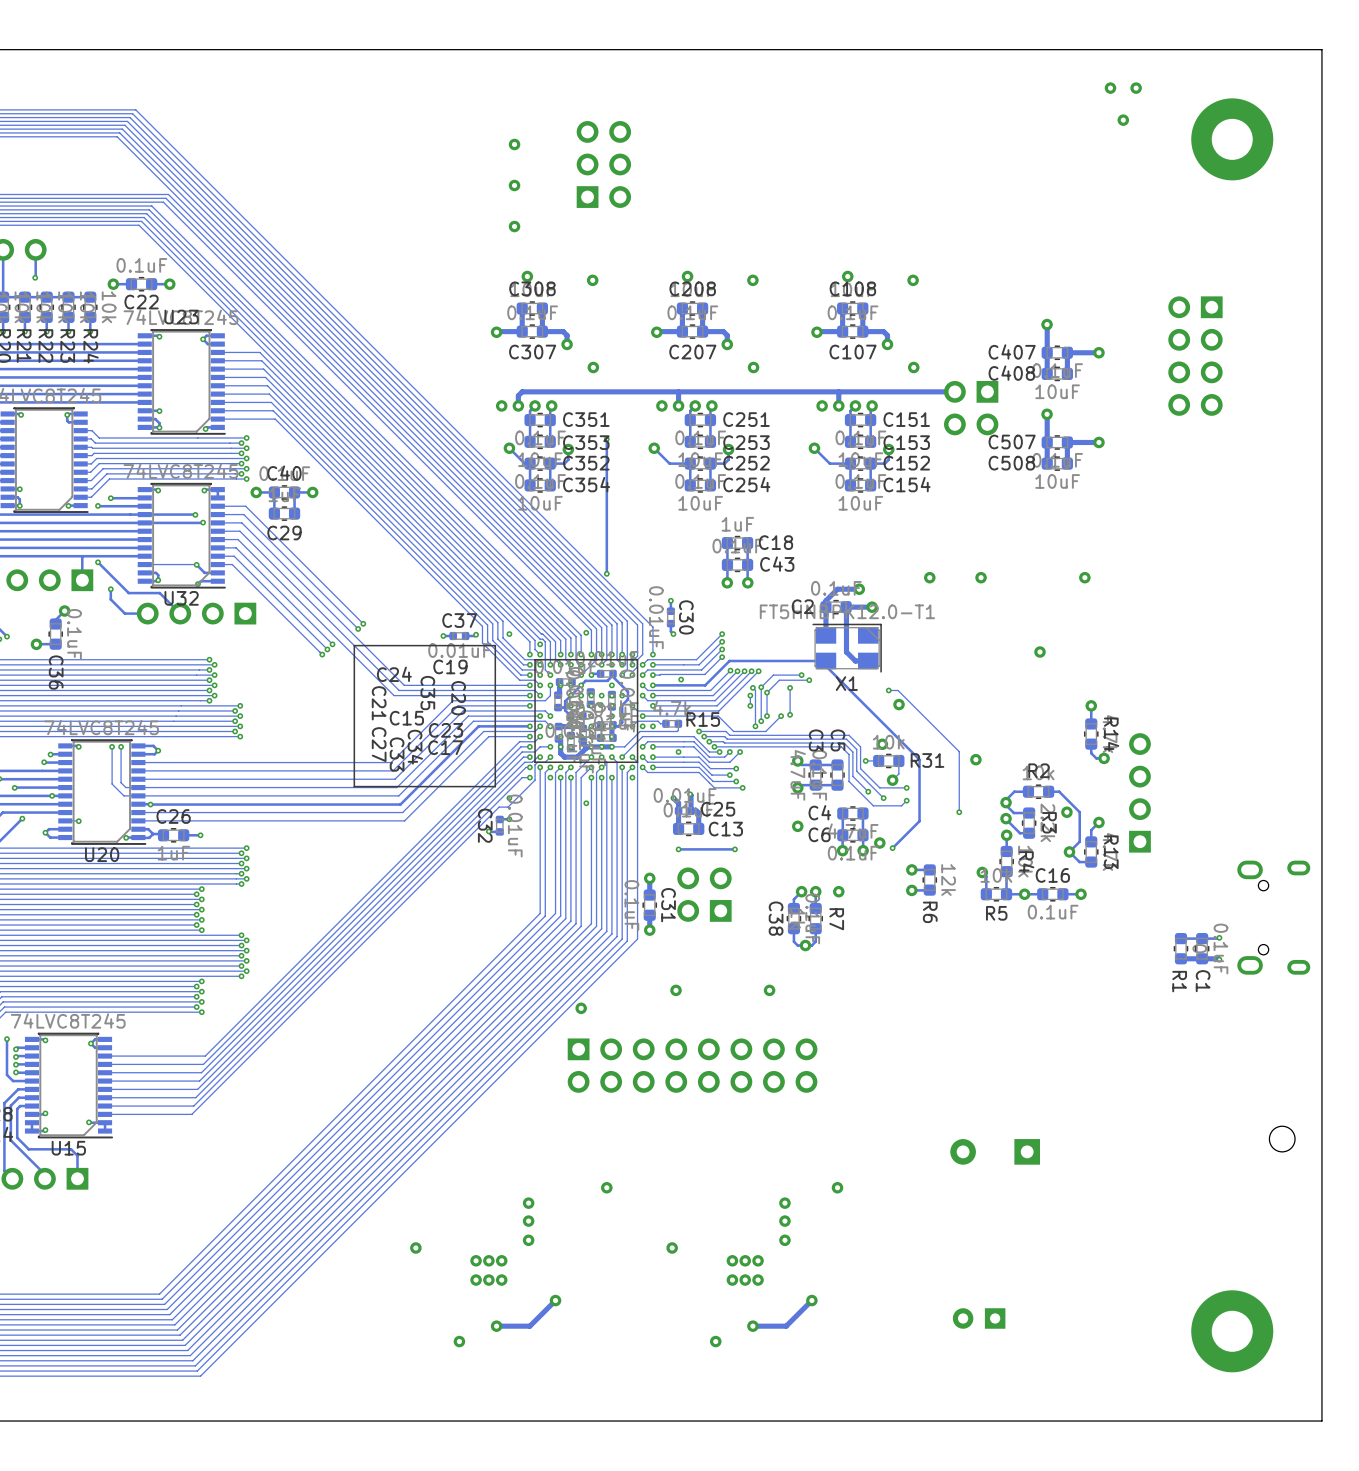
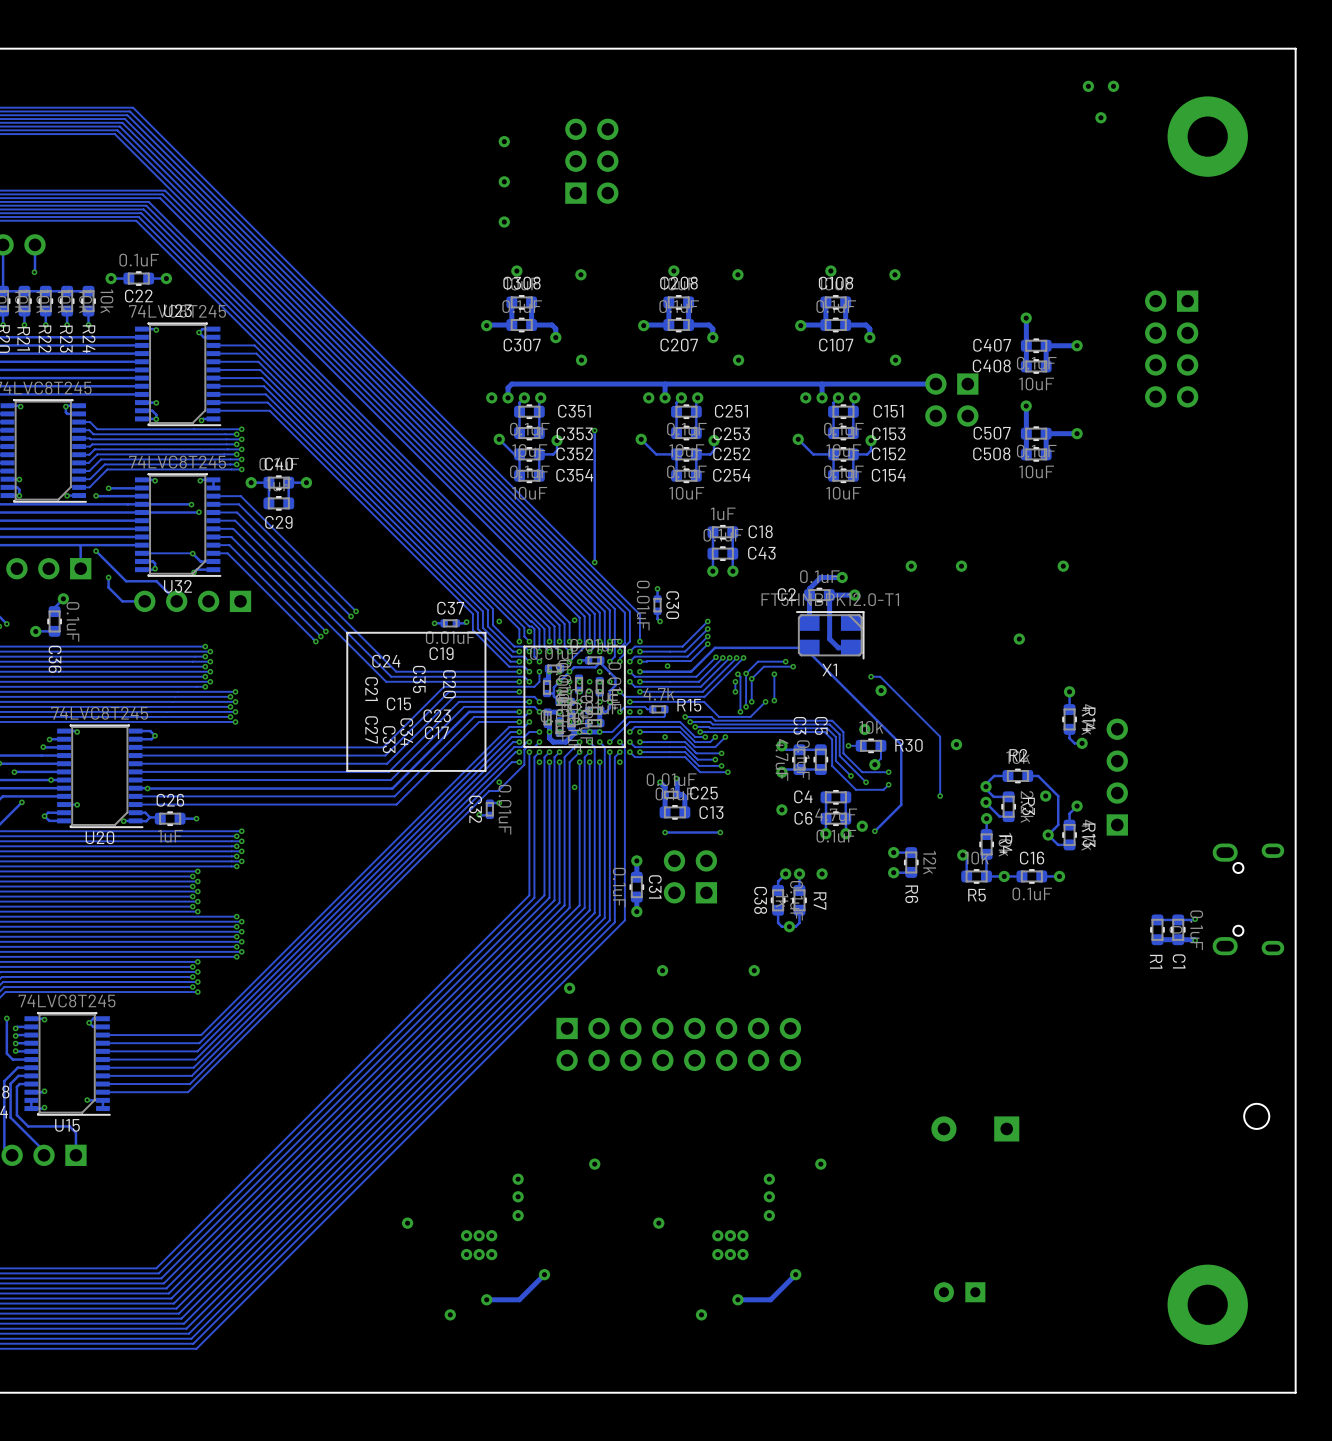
track: (112, 746) (112, 784) (123, 795) (138, 795) -> none
via: (112, 746) -> none
track: (121, 746) (121, 782) (125, 787) (138, 787) -> none
via: (121, 746) -> none
R31 name: R31 (927, 760) -> R30 (908, 745)

